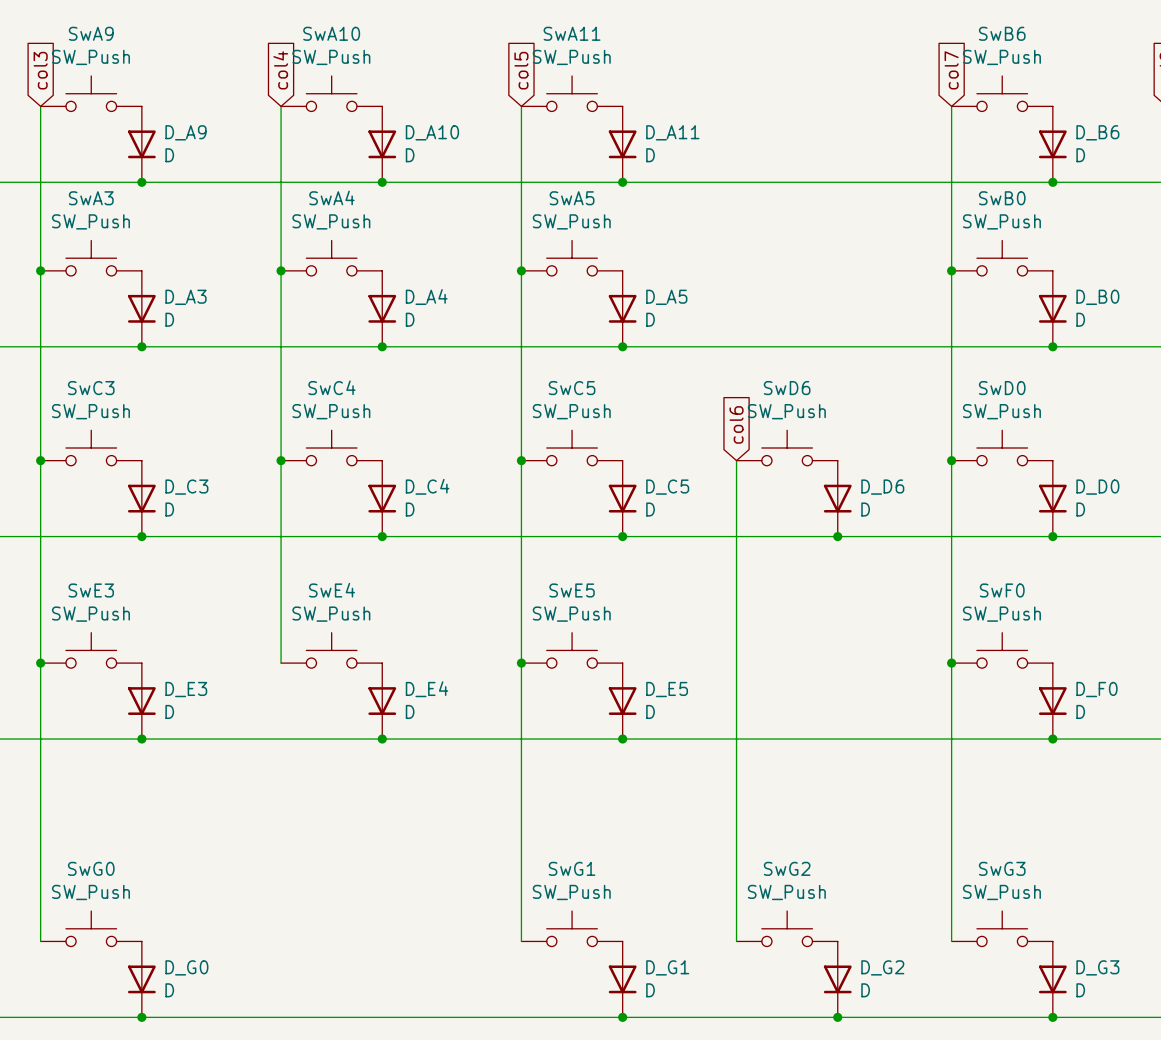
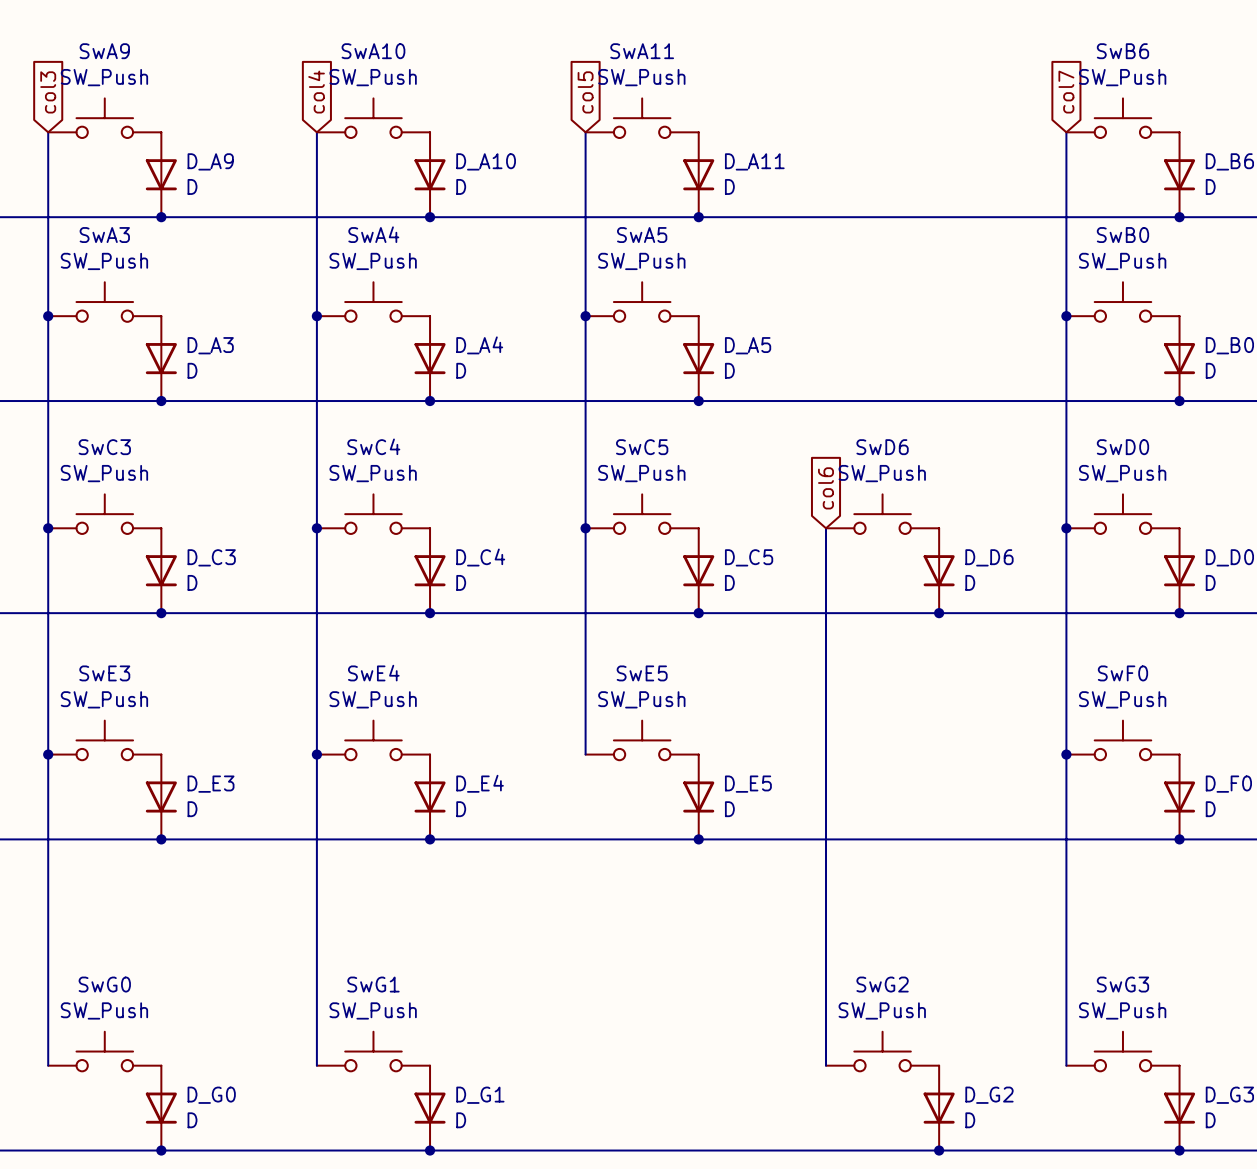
junction: none -> (316, 754)
wire: (521, 663) (521, 941) -> (316, 754) (316, 1065)
junction: (521, 663) -> none
SwG1 position: (572, 928) -> (373, 1051)
D_G1 position: (622, 979) -> (430, 1108)
junction: none -> (430, 1150)
junction: (622, 1017) -> none

